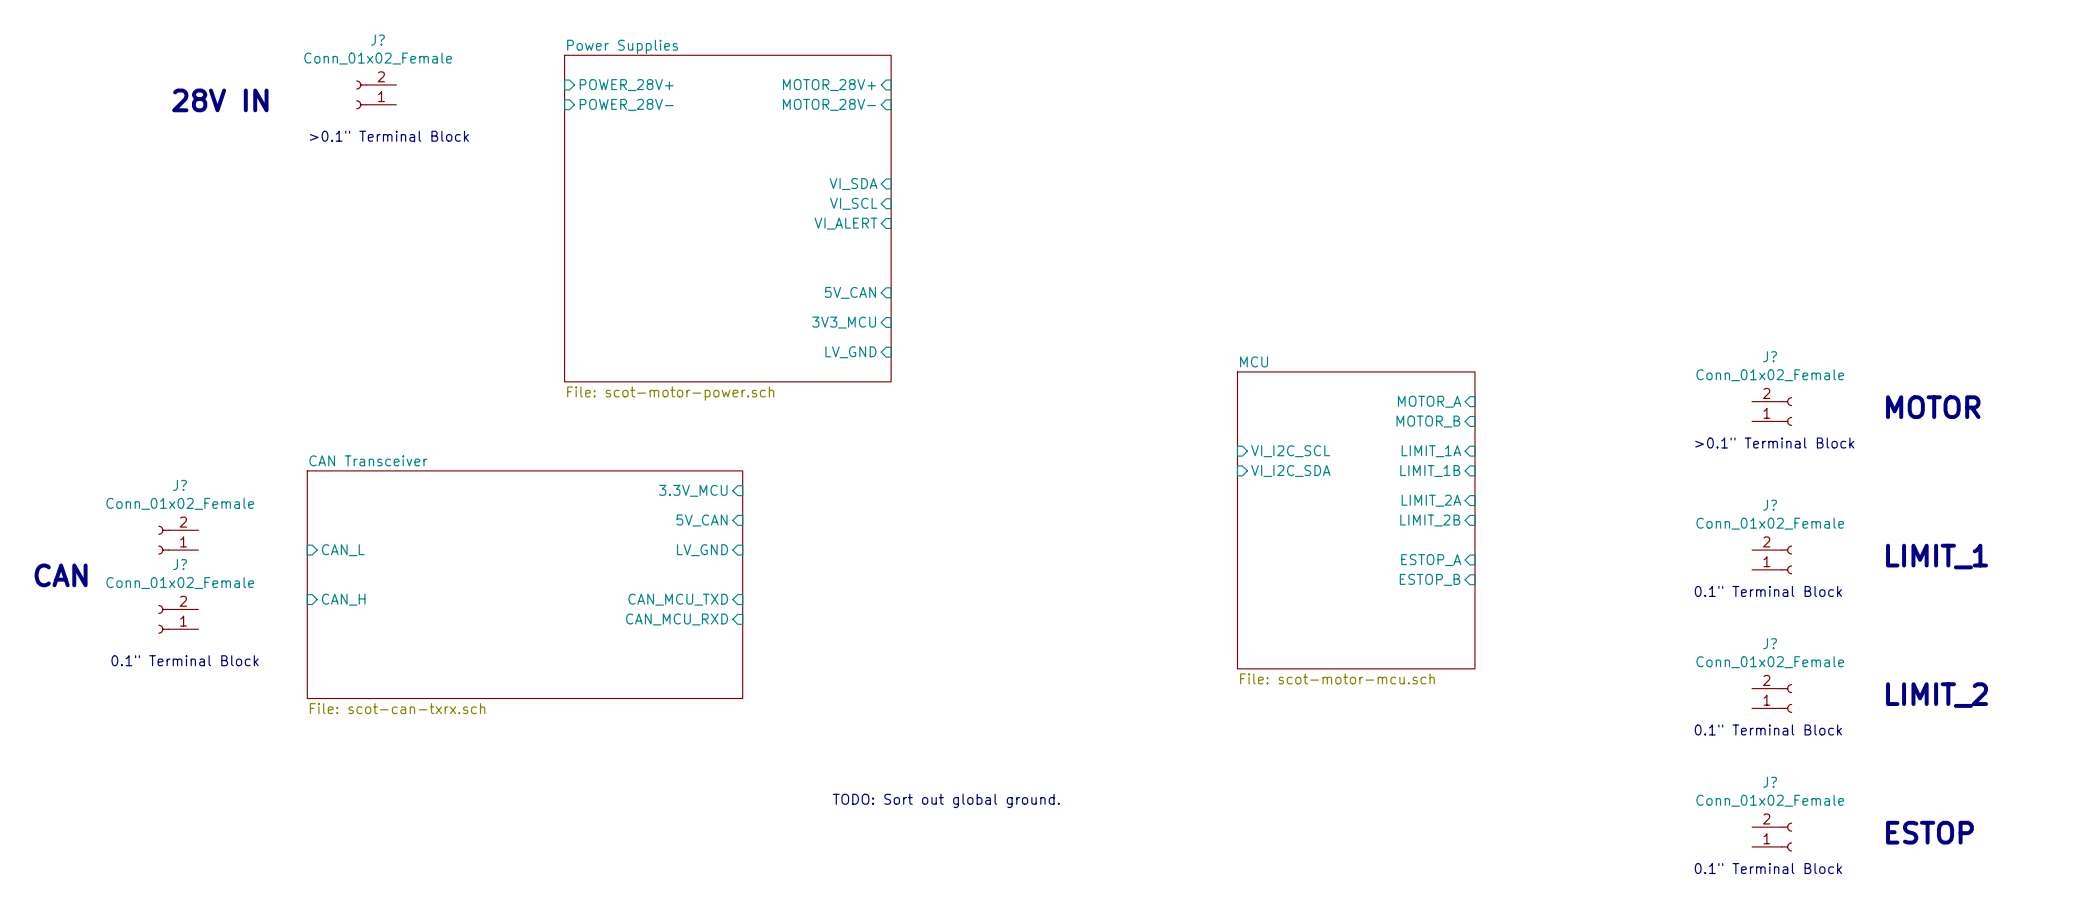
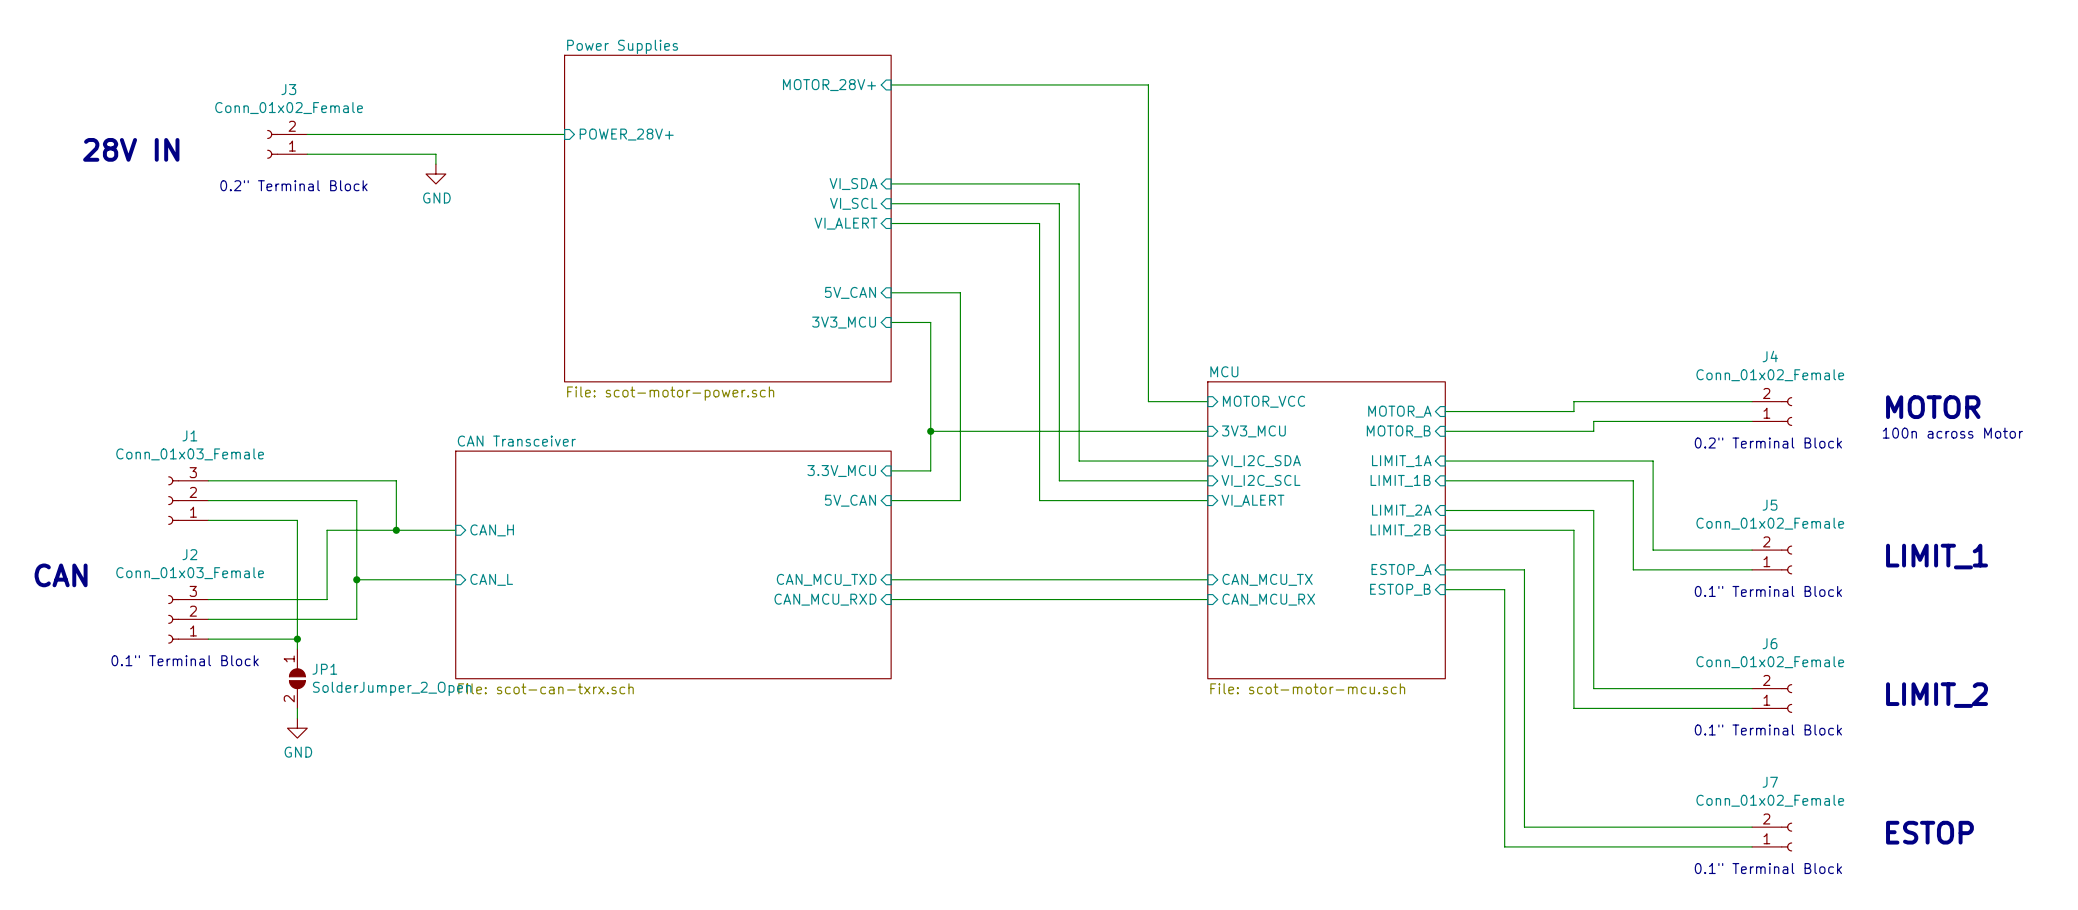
wire: none -> (891, 84) (1148, 84) (1148, 401) (1207, 401)
sheet pin position: POWER_28V+ (626, 85) -> POWER_28V+ (626, 134)
J?: Conn_01x02_Female (376, 94) -> none
text position: 28V IN (220, 100) -> 28V IN (131, 149)
sheet pin: POWER_28V- (626, 104) -> none
sheet pin: MOTOR_28V- (829, 104) -> none
wire: none -> (307, 134) (564, 134)
text: >0.1" Terminal Block (389, 136) -> none
J3: none -> Conn_01x02_Female (287, 144)
wire: none -> (307, 154) (435, 154) (435, 164)
power symbol: none -> GND (435, 174)
wire: none -> (891, 183) (1079, 183) (1079, 461) (1207, 461)
text: none -> 0.2" Terminal Block (293, 185)
wire: none -> (891, 203) (1059, 203) (1059, 480) (1207, 480)
wire: none -> (891, 223) (1039, 223) (1039, 500) (1207, 500)
wire: none -> (891, 292) (960, 292) (960, 500) (891, 500)
wire: none -> (891, 322) (930, 322) (930, 470) (891, 470)
sheet pin: LV_GND (850, 352) -> none
J? name: J? (1770, 356) -> J4 (1770, 356)
sheet pin: none -> MOTOR_VCC (1264, 401)
sheet pin position: MOTOR_A (1429, 401) -> MOTOR_A (1399, 411)
wire: none -> (1752, 401) (1573, 401) (1573, 411) (1445, 411)
sheet pin position: MOTOR_B (1428, 421) -> MOTOR_B (1398, 431)
wire: none -> (1752, 421) (1593, 421) (1593, 431) (1445, 431)
wire: none -> (930, 431) (1207, 431)
junction: none -> (930, 431)
sheet pin: none -> 3V3_MCU (1253, 431)
text: none -> 100n across Motor (1952, 433)
text: >0.1" Terminal Block (1774, 443) -> 0.2" Terminal Block (1768, 443)
sheet pin position: VI_I2C_SCL (1290, 451) -> VI_I2C_SCL (1260, 480)
sheet pin position: LIMIT_1A (1431, 451) -> LIMIT_1A (1401, 461)
wire: none -> (1445, 461) (1653, 461) (1653, 550) (1752, 550)
sheet pin position: VI_I2C_SDA (1290, 471) -> VI_I2C_SDA (1261, 461)
sheet pin position: LIMIT_1B (1430, 471) -> LIMIT_1B (1400, 480)
wire: none -> (208, 480) (396, 480) (396, 530)
wire: none -> (1445, 480) (1633, 480) (1633, 569) (1752, 569)
sheet pin position: 3.3V_MCU (693, 490) -> 3.3V_MCU (841, 471)
J1: none -> Conn_01x03_Female (188, 500)
wire: none -> (208, 500) (356, 500) (356, 619) (208, 619)
sheet pin: none -> VI_ALERT (1252, 500)
sheet pin position: LIMIT_2A (1431, 500) -> LIMIT_2A (1401, 510)
J? name: J? (1770, 505) -> J5 (1770, 505)
wire: none -> (1445, 510) (1593, 510) (1593, 688) (1752, 688)
wire: none -> (208, 520) (297, 520) (297, 649)
sheet pin position: 5V_CAN (702, 520) -> 5V_CAN (850, 500)
sheet MCU position: (1356, 520) -> (1326, 530)
sheet pin position: LIMIT_2B (1430, 520) -> LIMIT_2B (1400, 530)
junction: none -> (396, 530)
wire: none -> (455, 530) (327, 530) (327, 599) (208, 599)
wire: none -> (1445, 530) (1573, 530) (1573, 708) (1752, 708)
J?: Conn_01x02_Female (178, 540) -> none
sheet pin position: CAN_L (343, 550) -> CAN_L (491, 579)
sheet pin: LV_GND (702, 550) -> none
sheet pin position: ESTOP_A (1431, 560) -> ESTOP_A (1401, 569)
wire: none -> (1445, 569) (1524, 569) (1524, 827) (1752, 827)
wire: none -> (356, 579) (455, 579)
junction: none -> (356, 579)
wire: none -> (891, 579) (1207, 579)
sheet pin: none -> CAN_MCU_TX (1267, 579)
sheet pin position: ESTOP_B (1430, 579) -> ESTOP_B (1400, 589)
sheet CAN Transceiver position: (524, 584) -> (673, 564)
wire: none -> (1445, 589) (1504, 589) (1504, 846) (1752, 846)
sheet pin position: CAN_H (343, 599) -> CAN_H (492, 530)
sheet pin position: CAN_MCU_TXD (678, 599) -> CAN_MCU_TXD (826, 579)
wire: none -> (891, 599) (1207, 599)
sheet pin: none -> CAN_MCU_RX (1268, 599)
J?: Conn_01x02_Female (178, 619) -> none
J2: none -> Conn_01x03_Female (188, 619)
sheet pin position: CAN_MCU_RXD (677, 619) -> CAN_MCU_RXD (825, 599)
wire: none -> (208, 639) (297, 639)
junction: none -> (297, 639)
J? name: J? (1770, 643) -> J6 (1770, 643)
JP1: none -> SolderJumper_2_Open (297, 678)
wire: none -> (297, 708) (297, 718)
power symbol: none -> GND (297, 728)
J? name: J? (1770, 782) -> J7 (1770, 782)
text: TODO: Sort out global ground. (946, 800) -> none

